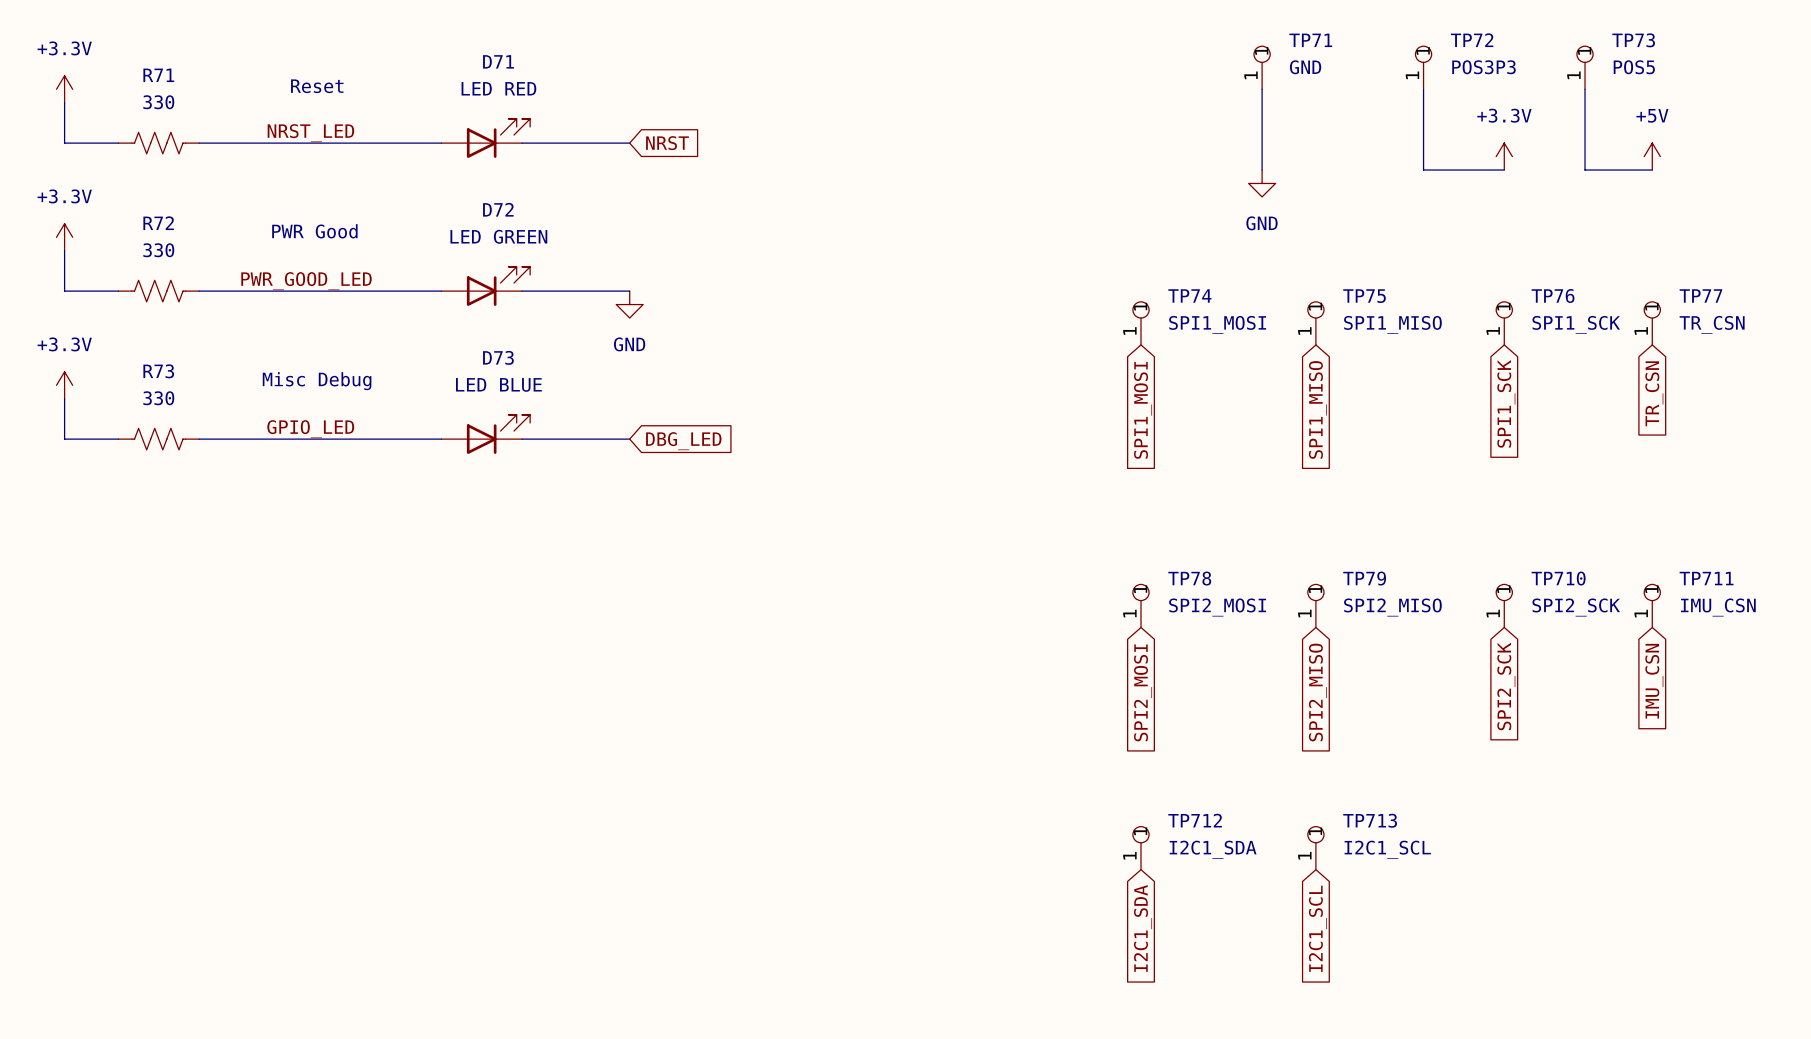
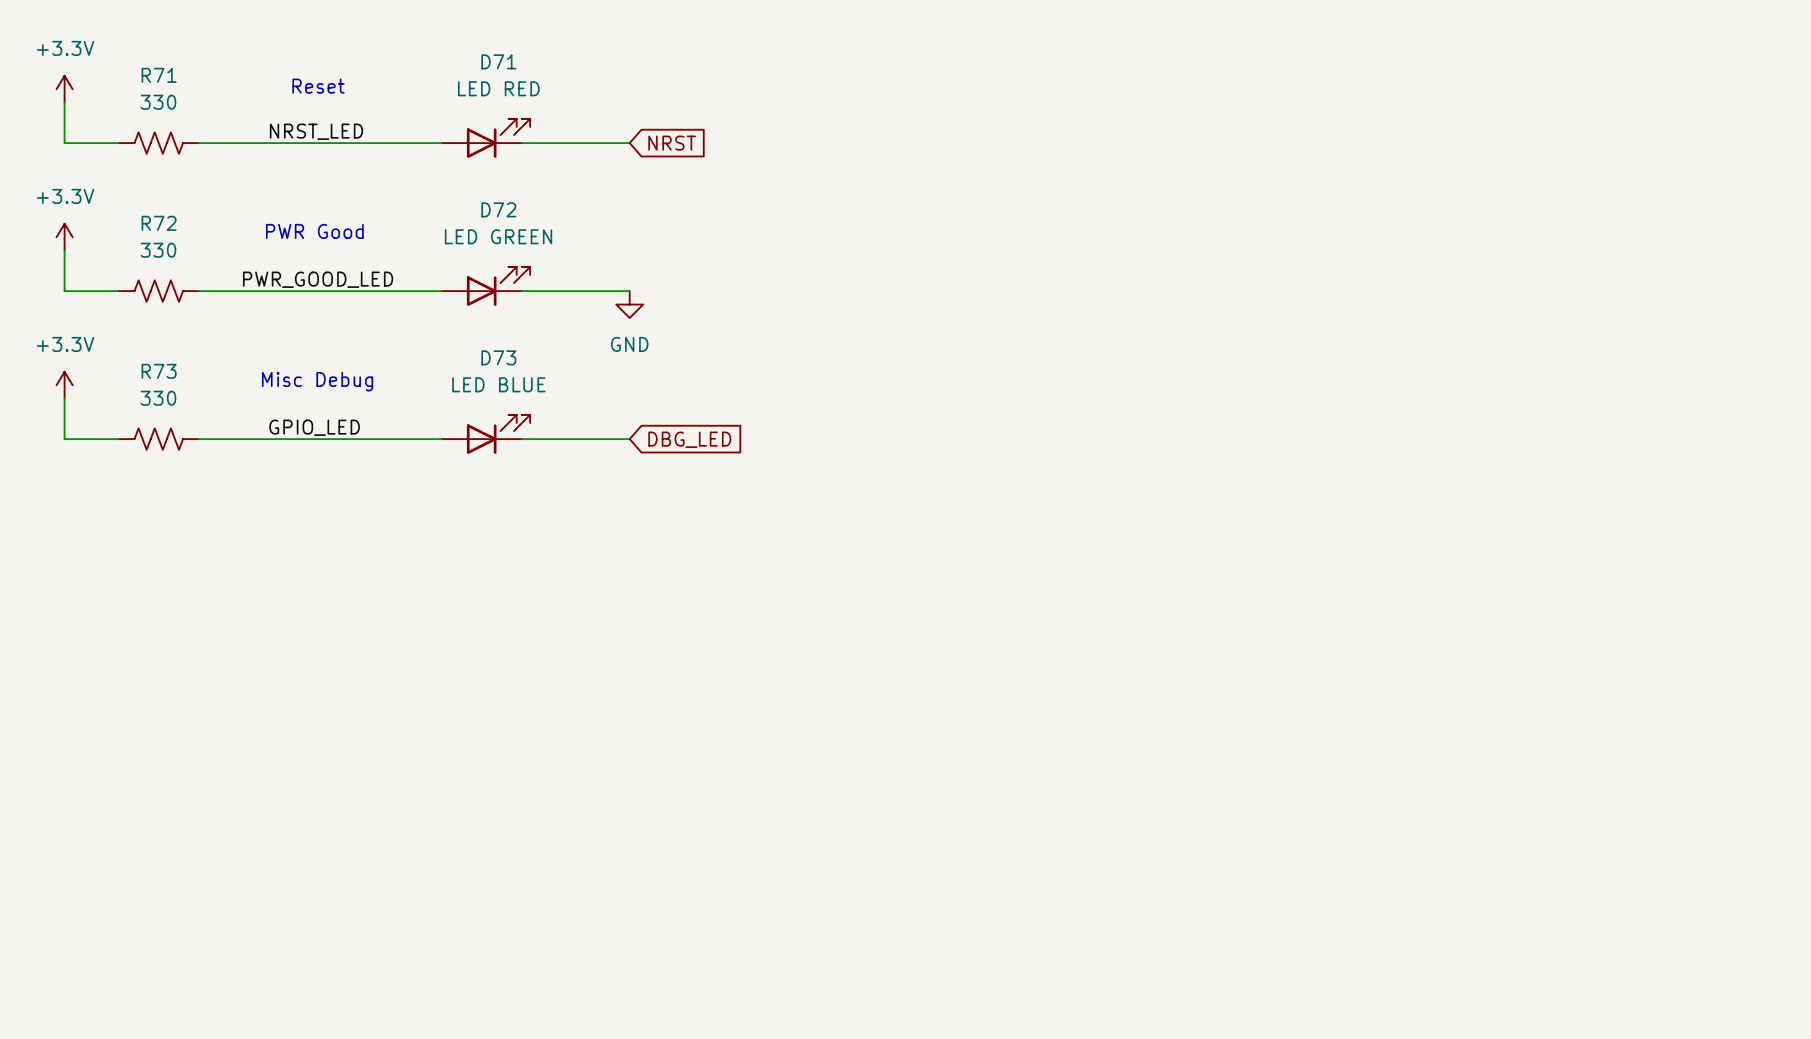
TP71: GND (1262, 67) -> none
TP72: POS3P3 (1423, 67) -> none
TP73: POS5 (1585, 67) -> none
wire: (1262, 89) (1262, 170) -> none
wire: (1423, 89) (1423, 170) (1504, 170) -> none
wire: (1585, 89) (1585, 170) (1652, 170) -> none
power symbol: +3.3V (1504, 156) -> none
power symbol: +5V (1652, 156) -> none
power symbol: GND (1262, 183) -> none
TP74: SPI1_MOSI (1141, 323) -> none
TP75: SPI1_MISO (1315, 323) -> none
TP76: SPI1_SCK (1504, 323) -> none
TP77: TR_CSN (1652, 323) -> none
global label: TR_CSN (1654, 393) -> none
global label: SPI1_SCK (1506, 403) -> none
global label: SPI1_MISO (1317, 409) -> none
global label: SPI1_MOSI (1143, 410) -> none
TP78: SPI2_MOSI (1141, 605) -> none
TP79: SPI2_MISO (1315, 605) -> none
TP710: SPI2_SCK (1504, 605) -> none
TP711: IMU_CSN (1652, 605) -> none
global label: IMU_CSN (1654, 681) -> none
global label: SPI2_SCK (1506, 686) -> none
global label: SPI2_MOSI (1143, 692) -> none
global label: SPI2_MISO (1317, 692) -> none
TP712: I2C1_SDA (1141, 848) -> none
TP713: I2C1_SCL (1315, 848) -> none
global label: I2C1_SDA (1143, 928) -> none
global label: I2C1_SCL (1317, 928) -> none

